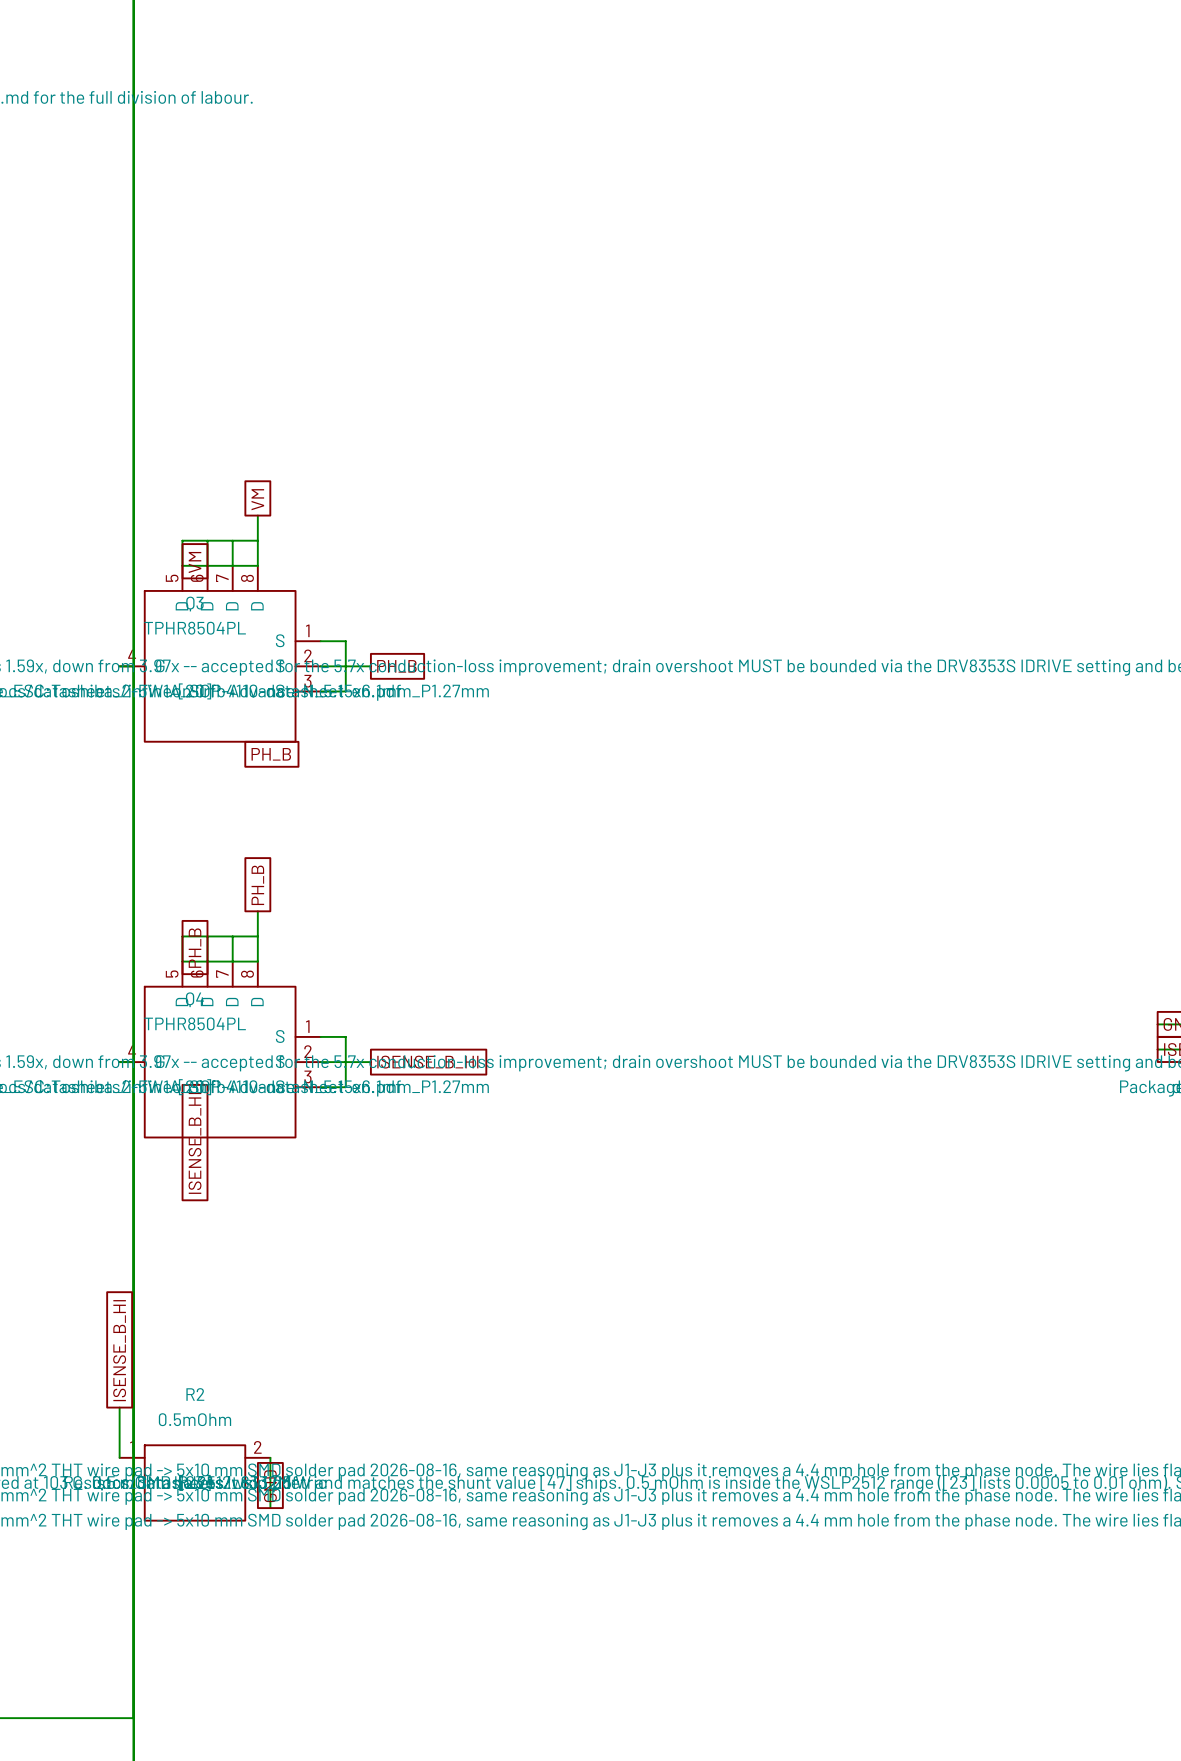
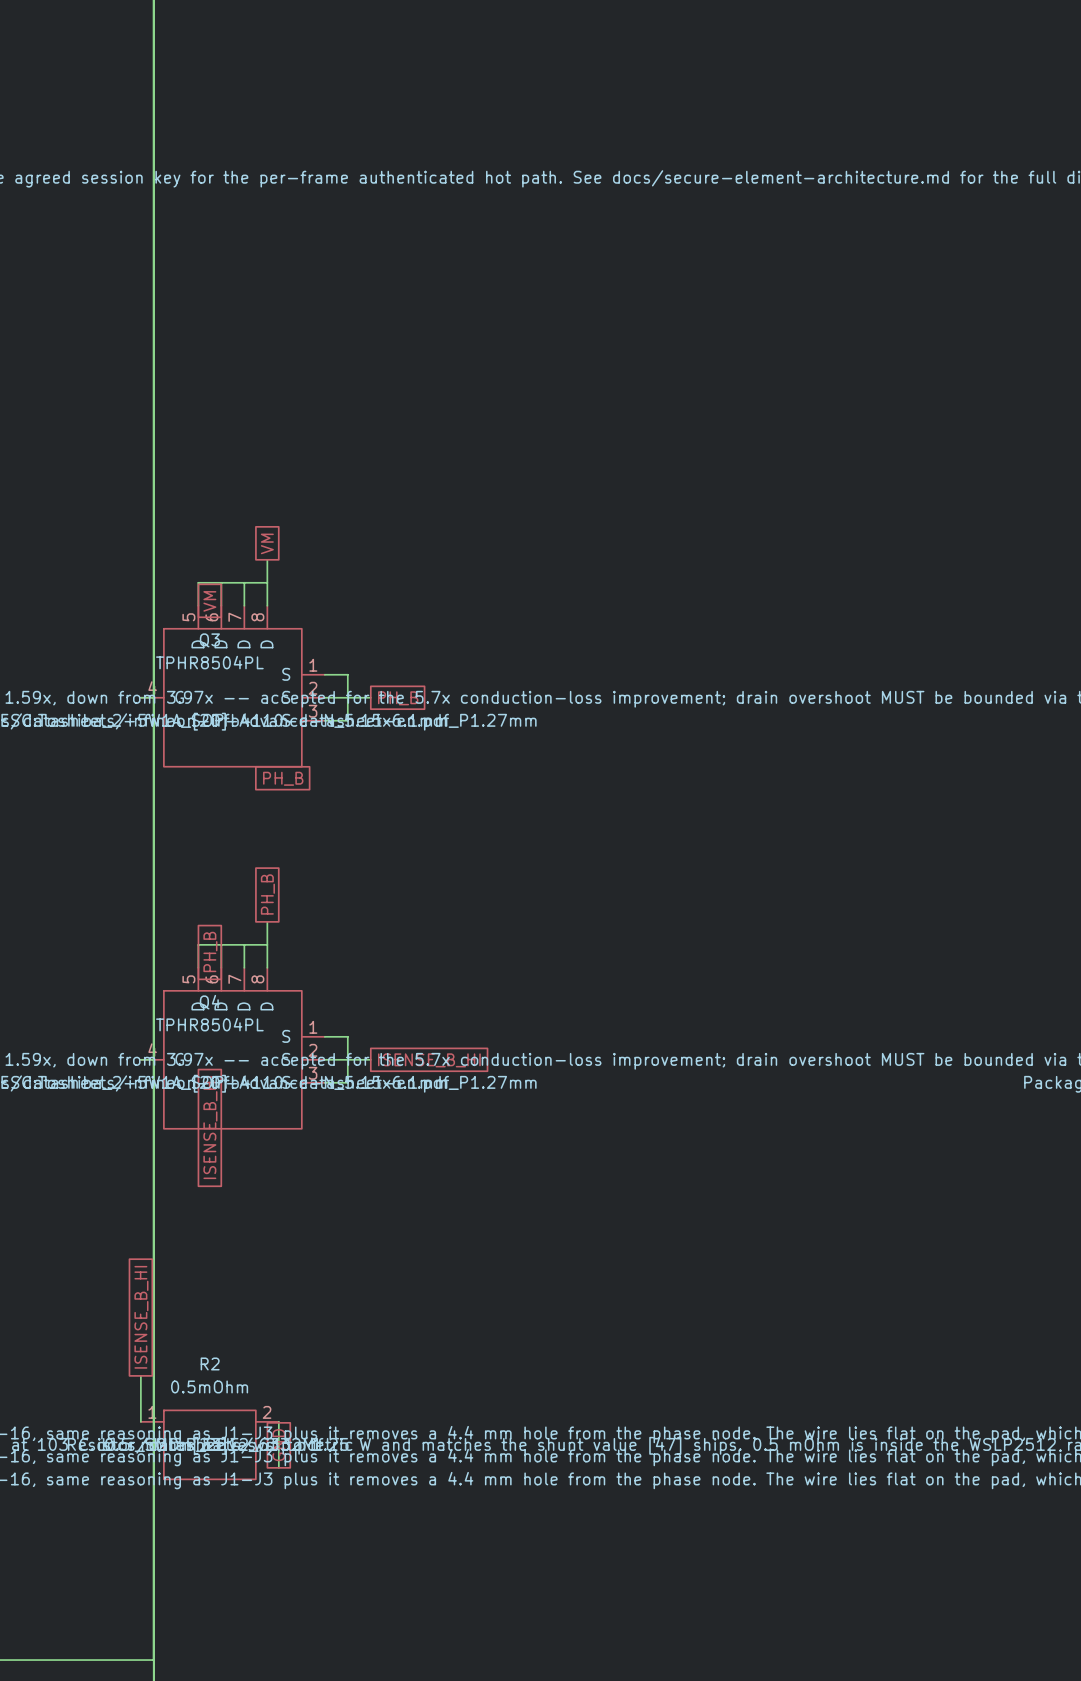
wire: (182, 565) (257, 565) -> none
wire: (182, 961) (257, 961) -> none

